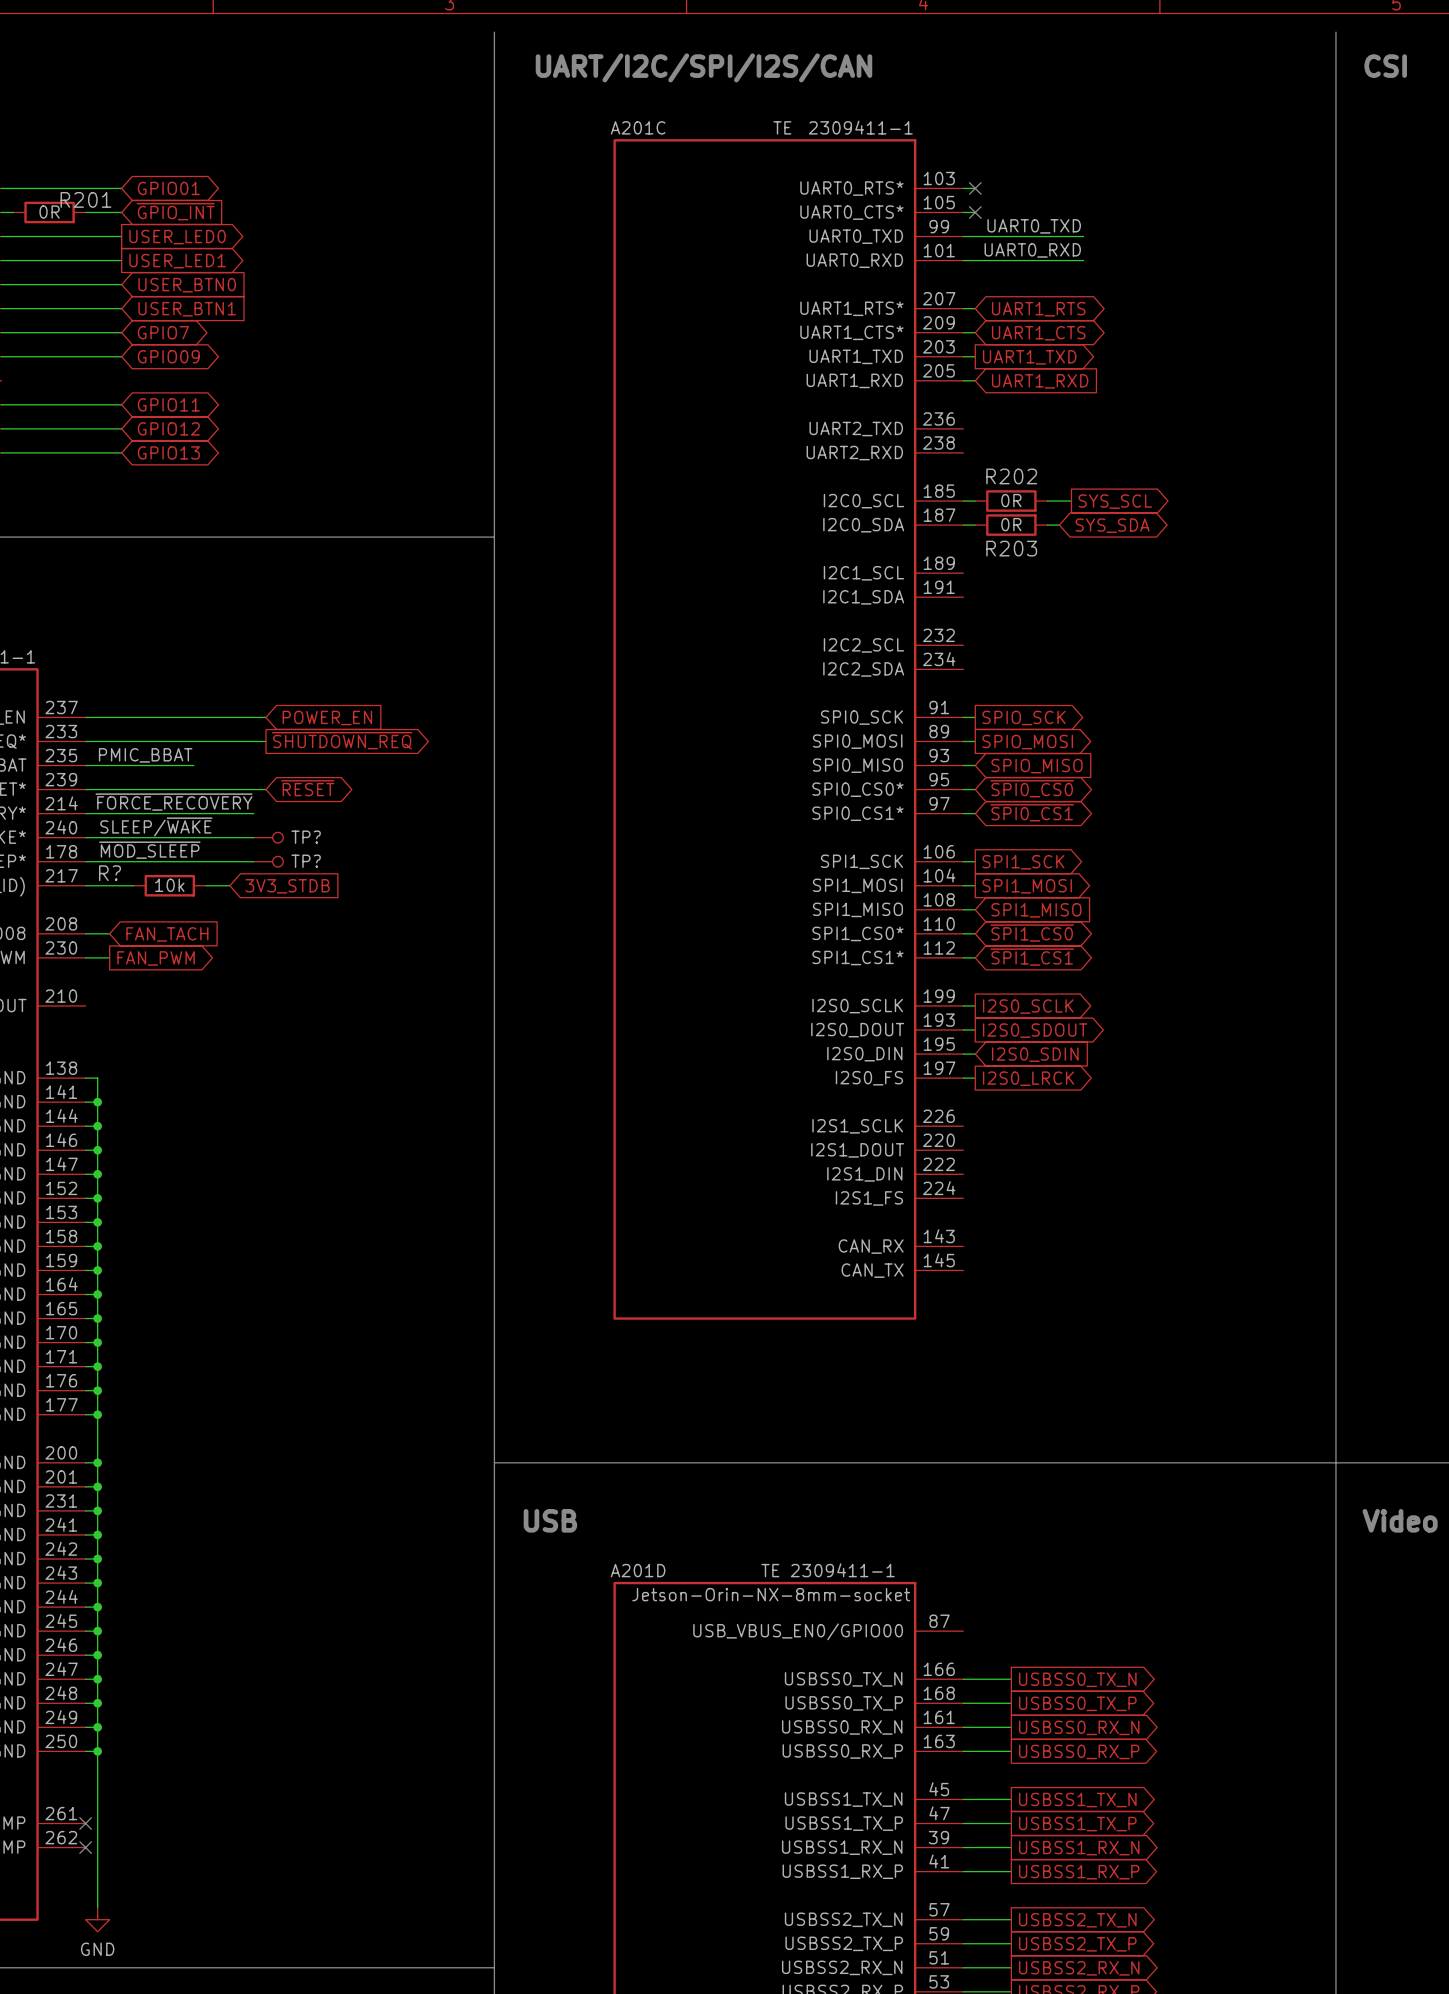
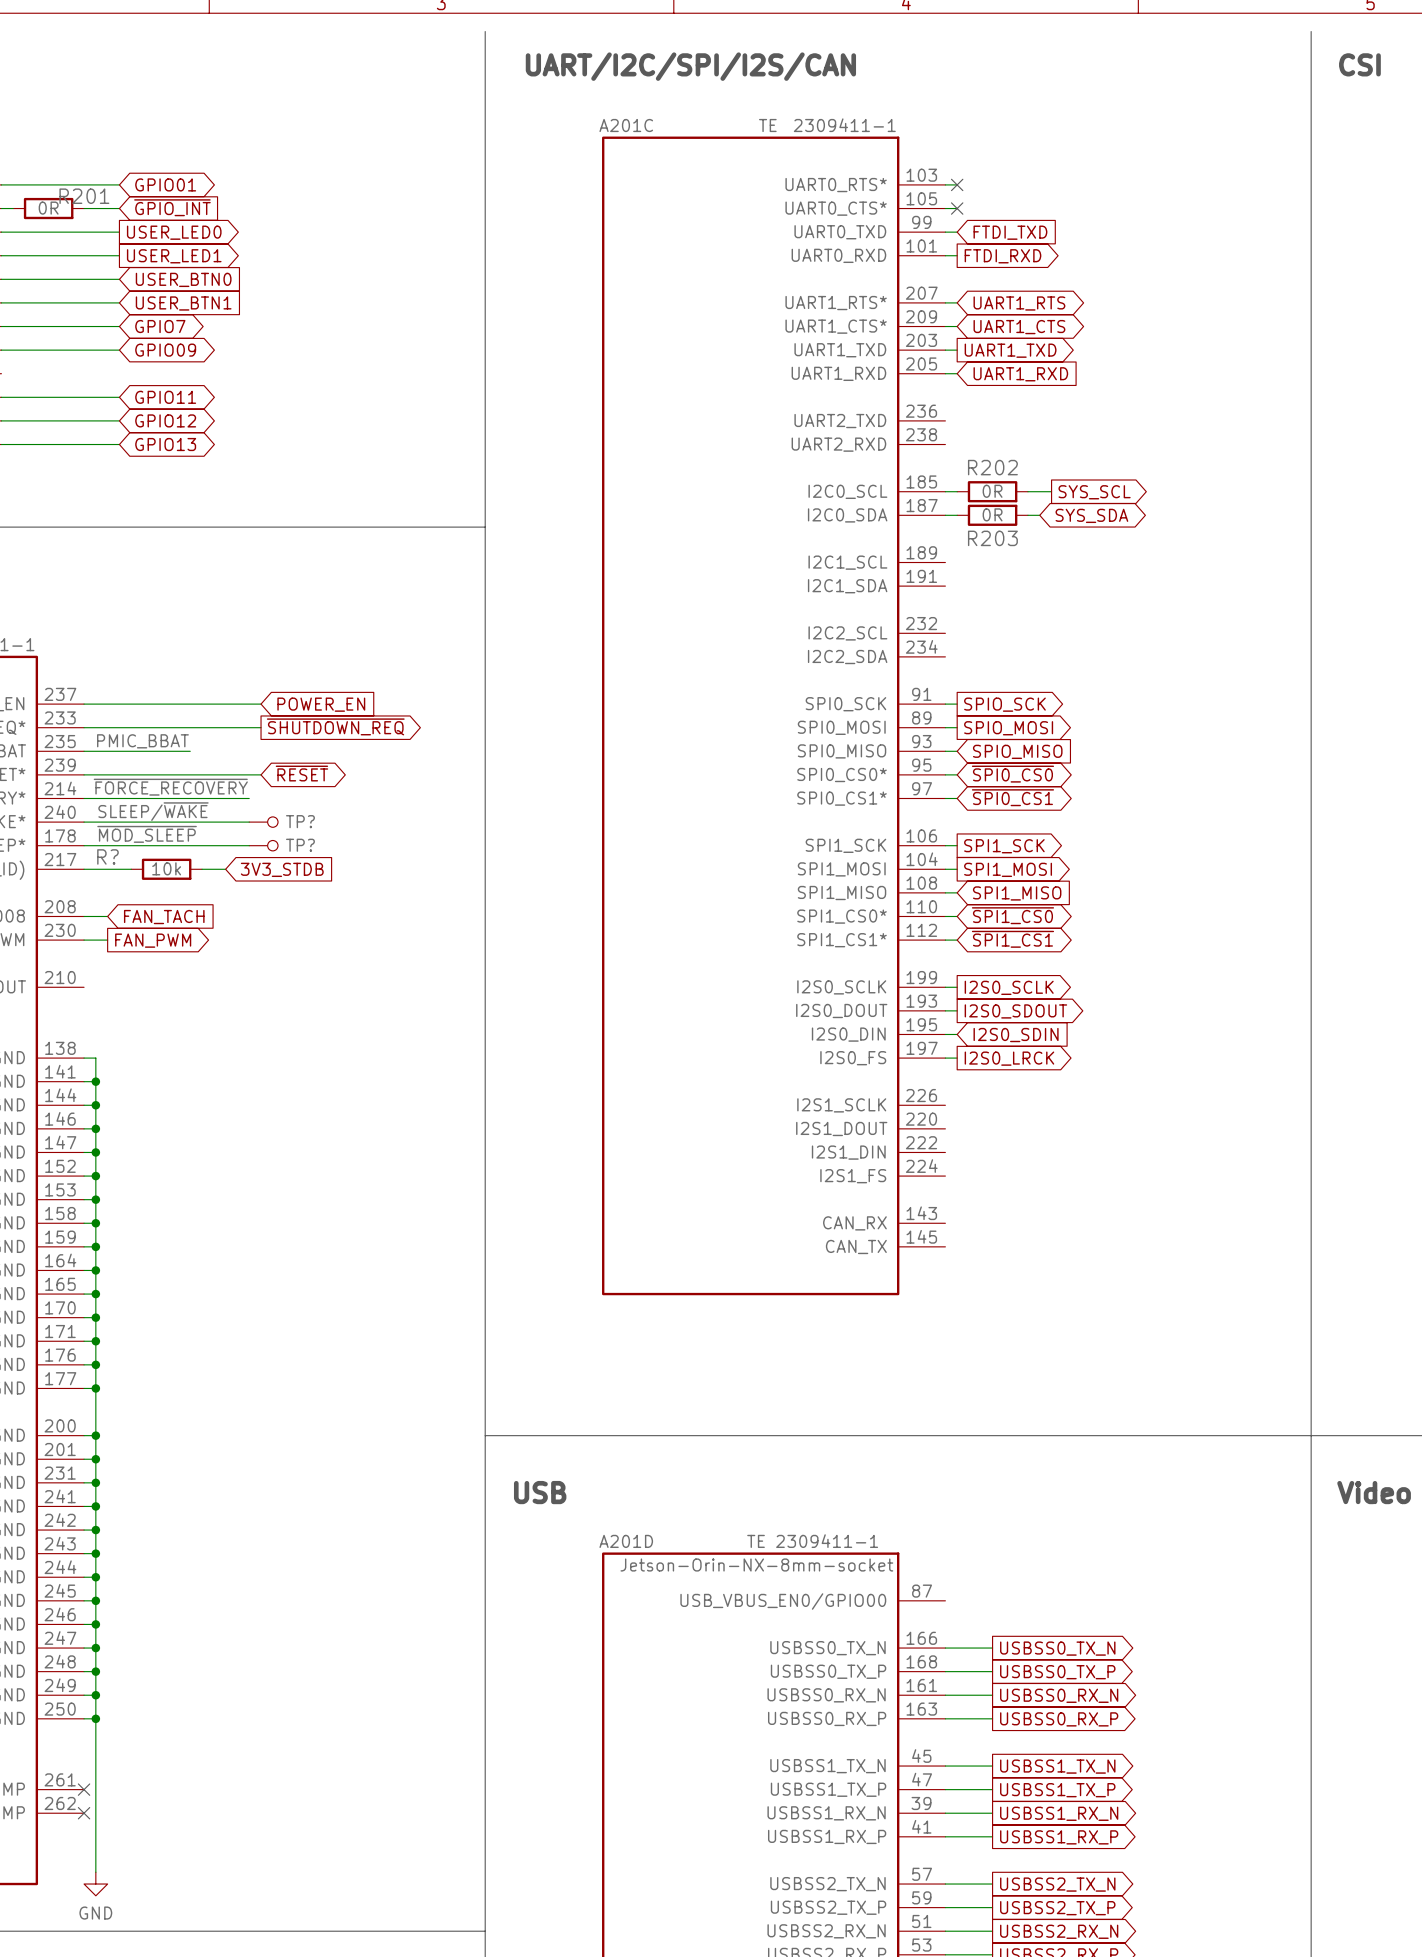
label: UART0_TXD (1034, 226) -> none
wire: (975, 236) (1083, 236) -> none
global label: none -> FTDI_TXD (1010, 232)
label: UART0_RXD (1032, 250) -> none
wire: (975, 260) (1083, 260) -> none
global label: none -> FTDI_RXD (1002, 256)

